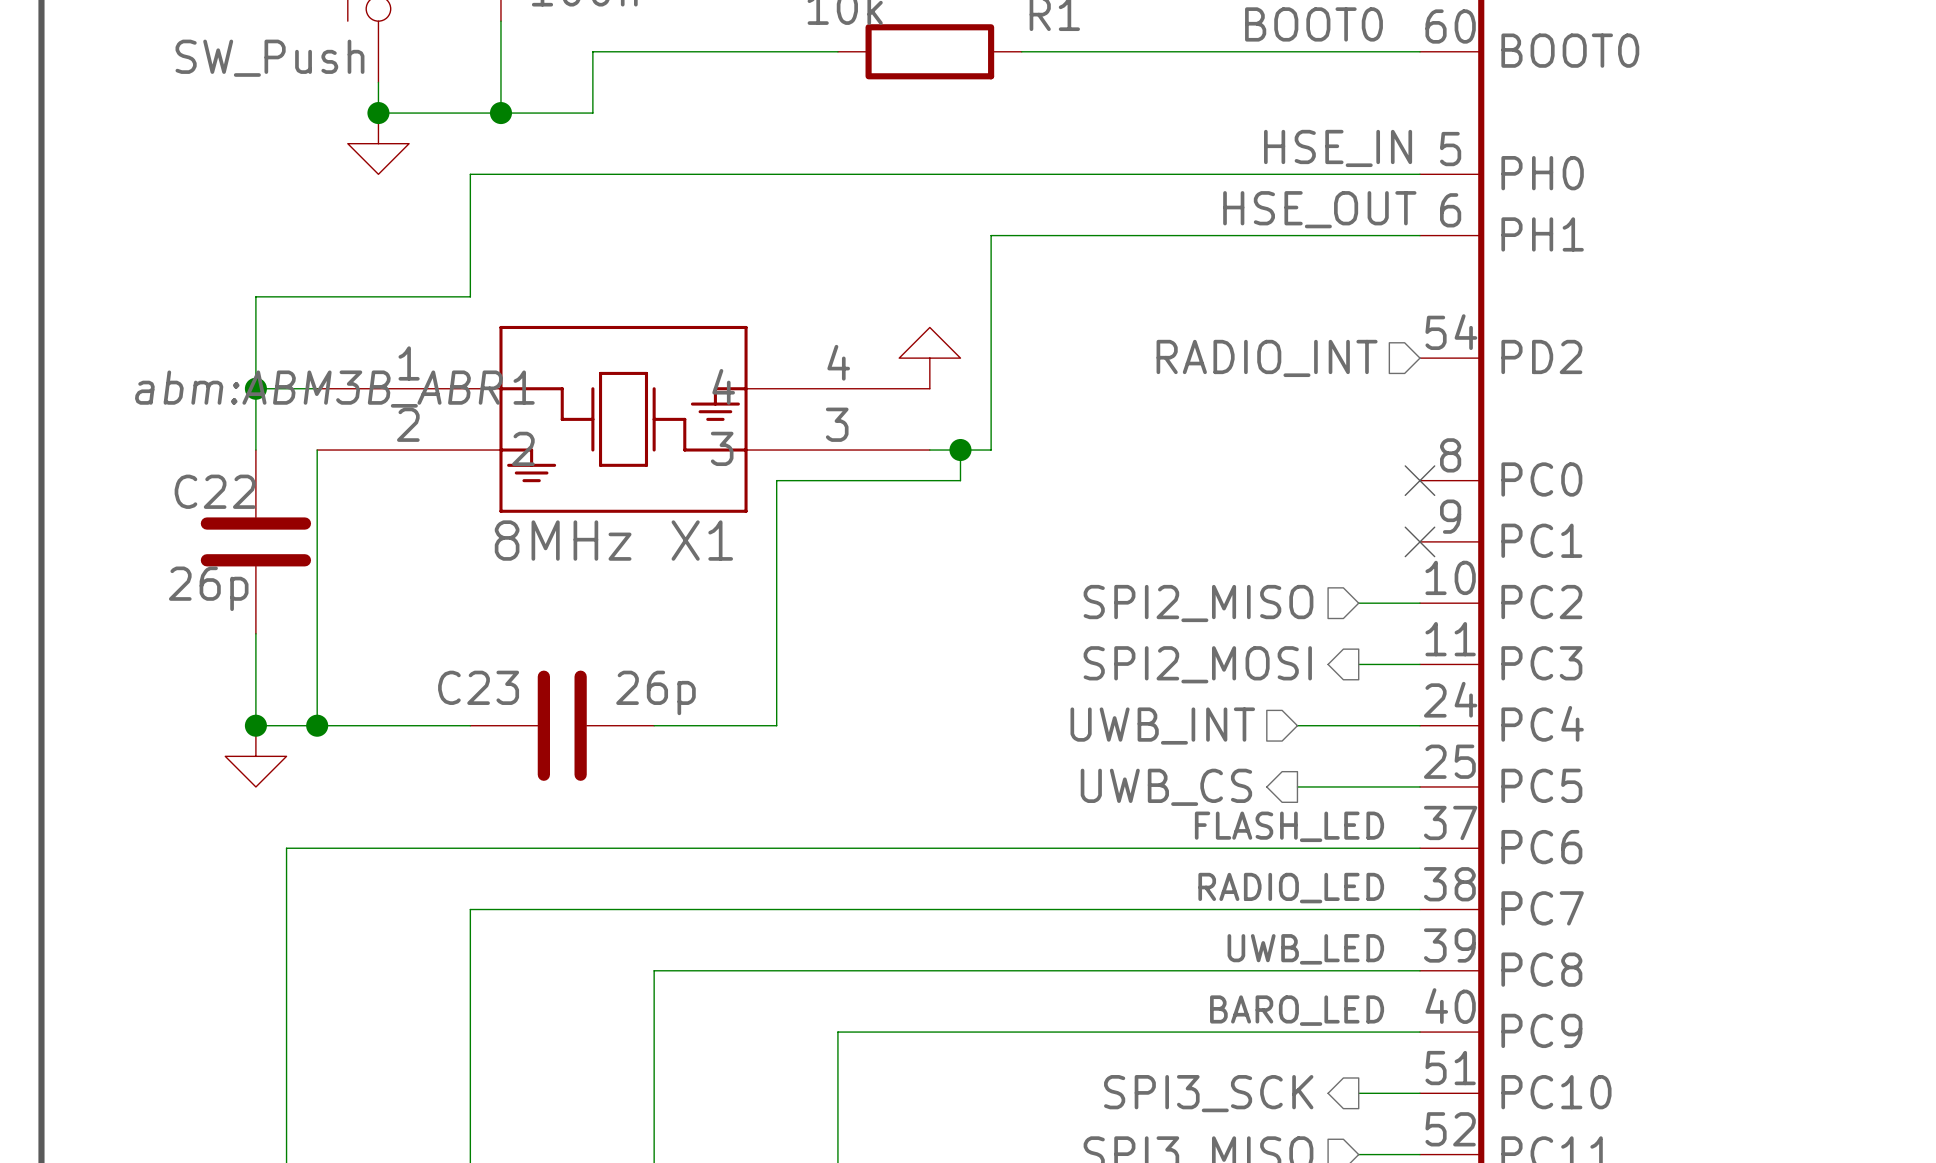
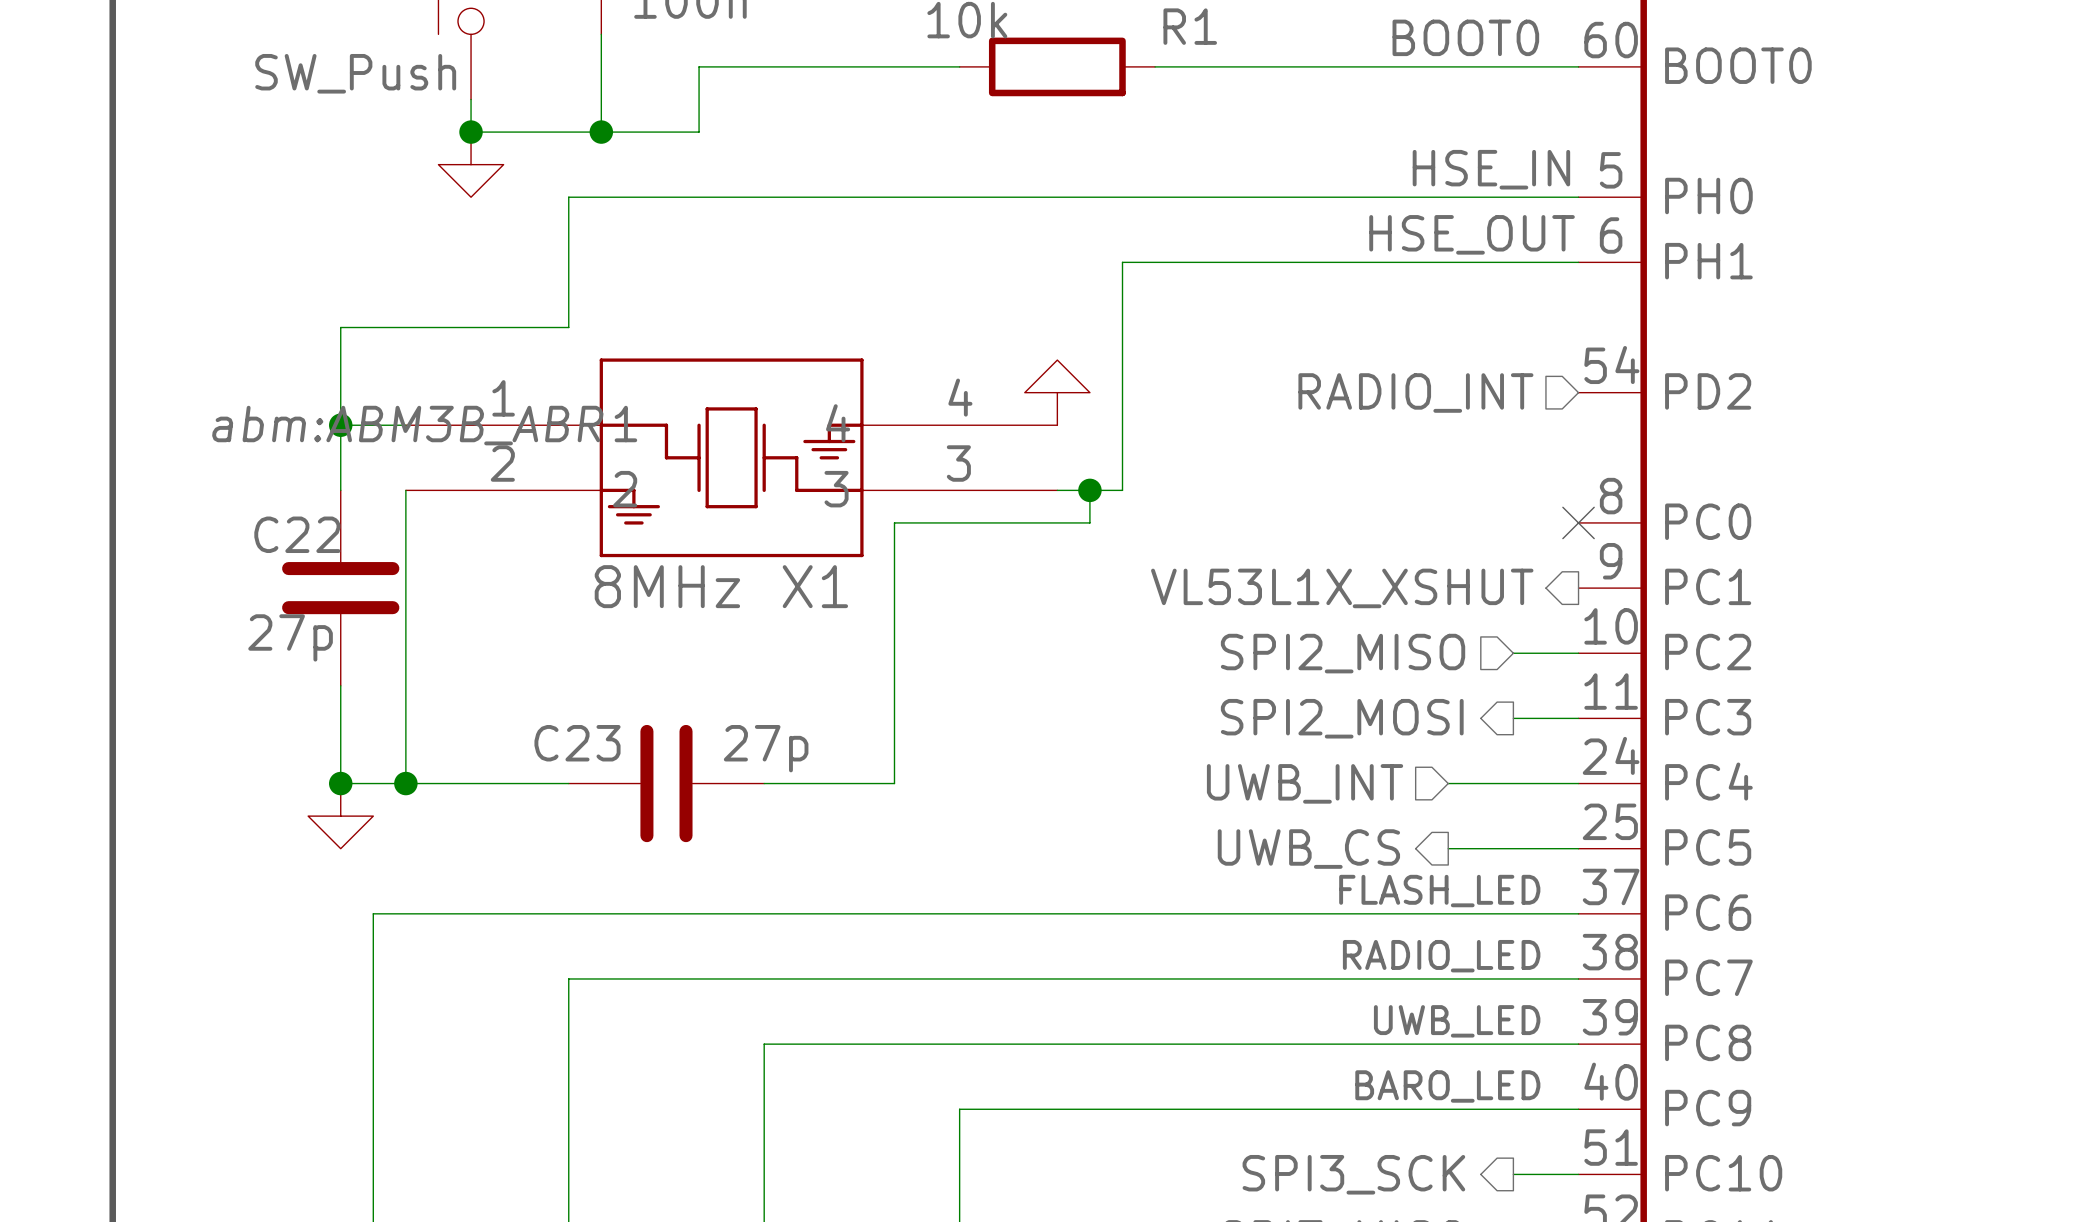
no-connect mark: (1419, 541) -> none
hierarchical label: none -> VL53L1X_XSHUT (1342, 588)
C22 value: 26p (208, 588) -> 27p (290, 637)
C23 value: 26p (655, 692) -> 27p (766, 748)

